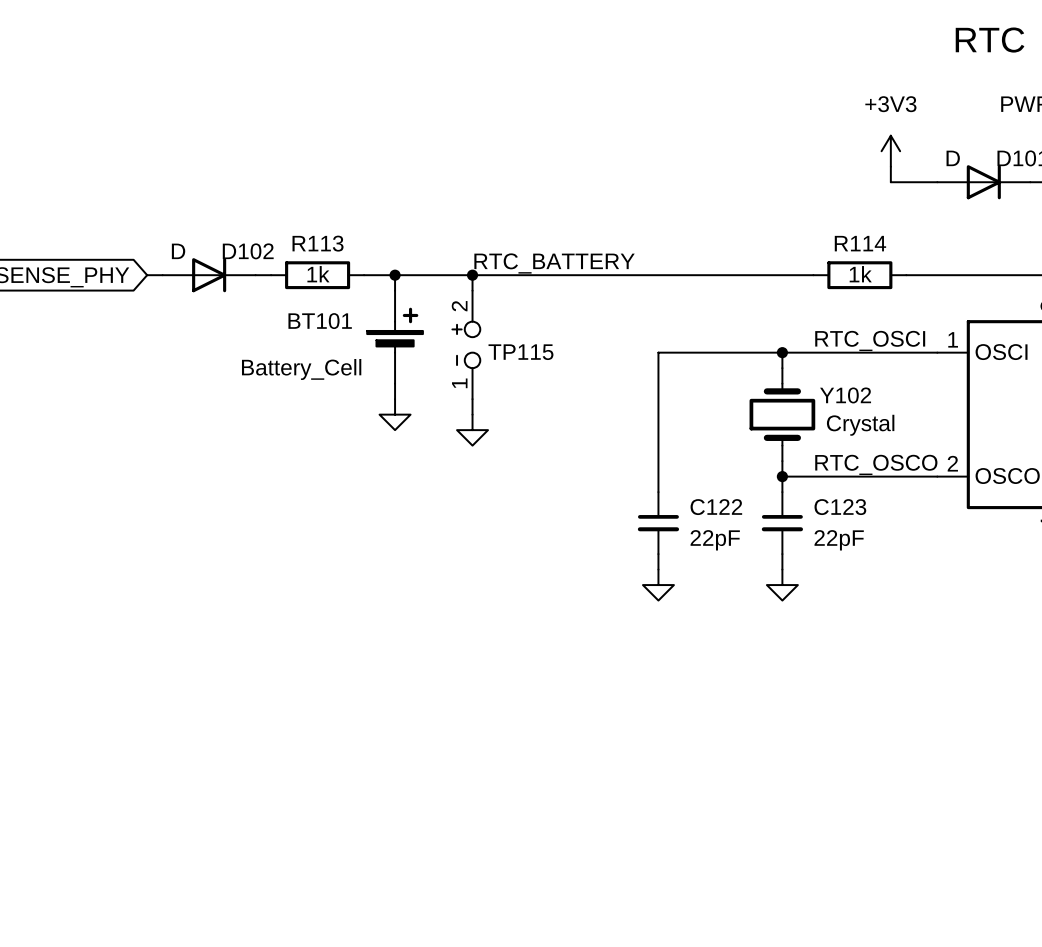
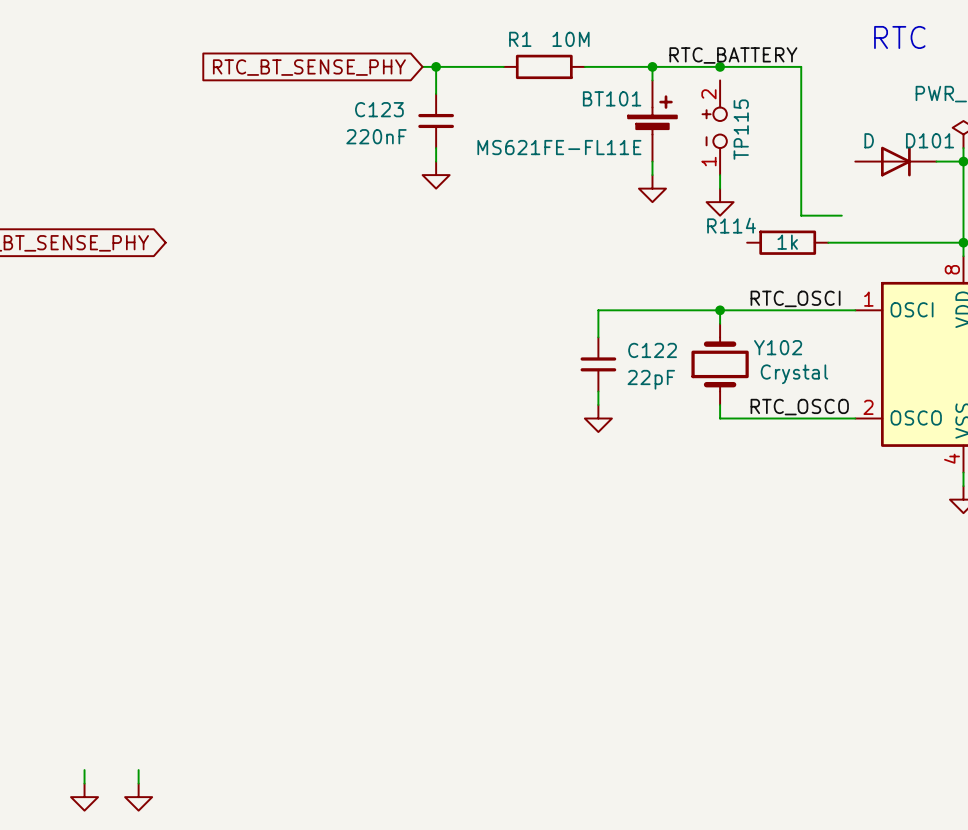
label: none -> RTC_BATTERY (733, 55)
wire: none -> (422, 66) (503, 66)
wire: none -> (436, 66) (436, 93)
junction: none -> (436, 66)
R1: none -> 10M (544, 66)
wire: none -> (584, 66) (801, 66) (801, 215) (841, 215)
wire: none -> (652, 66) (652, 80)
junction: none -> (652, 66)
junction: none -> (720, 66)
global label: none -> RTC_BT_SENSE_PHY (309, 67)
power symbol: +3V3 (890, 151) -> none
wire: (890, 166) (890, 182) (937, 182) -> none
wire: none -> (652, 161) (652, 175)
power symbol: none -> (436, 175)
power symbol: none -> (652, 188)
power symbol: none -> (720, 202)
R114 name position: R114 (860, 243) -> R114 (731, 225)
label: RTC_BATTERY (554, 263) -> none
wire: (147, 275) (162, 275) -> none
D102: D (209, 275) -> none
wire: (255, 275) (271, 275) -> none
R113: 1k (317, 275) -> none
wire: (364, 275) (813, 275) -> none
wire: (395, 275) (395, 290) -> none
junction: (395, 275) -> none
wire: (472, 275) (472, 290) -> (436, 148) (436, 161)
junction: (472, 275) -> none
BT101 name position: BT101 (320, 321) -> BT101 (612, 98)
BT101 position: (395, 337) -> (652, 121)
TP115 position: (466, 344) -> (714, 127)
TP115 name rotation: 0° (520, 352) -> 90° counterclockwise (741, 129)
wire: (658, 352) (658, 492) -> (611, 310) (598, 310) (598, 337)
BT101 value: Battery_Cell (301, 369) -> MS621FE-FL11E (559, 147)
wire: (395, 383) (395, 399) -> none
wire: (472, 399) (472, 414) -> none
power symbol: (395, 414) -> none
power symbol: (472, 430) -> none
power symbol: none -> (598, 418)
wire: (782, 476) (782, 492) -> (720, 175) (720, 188)
junction: (782, 476) -> none
C122 symbol: [637, 492, 680, 555] -> [580, 337, 617, 392]
C123 symbol: [761, 492, 804, 555] -> [418, 93, 454, 149]
C123 name position: C123 (840, 507) -> C123 (379, 109)
C123 value: 22pF (839, 540) -> 220nF (376, 136)
wire: (658, 554) (658, 569) -> (598, 391) (598, 404)
wire: (782, 554) (782, 569) -> none
power symbol: (658, 585) -> none
power symbol: (782, 585) -> none
wire: none -> (84, 770) (84, 783)
wire: none -> (138, 770) (138, 783)
power symbol: none -> (84, 797)
power symbol: none -> (138, 797)

